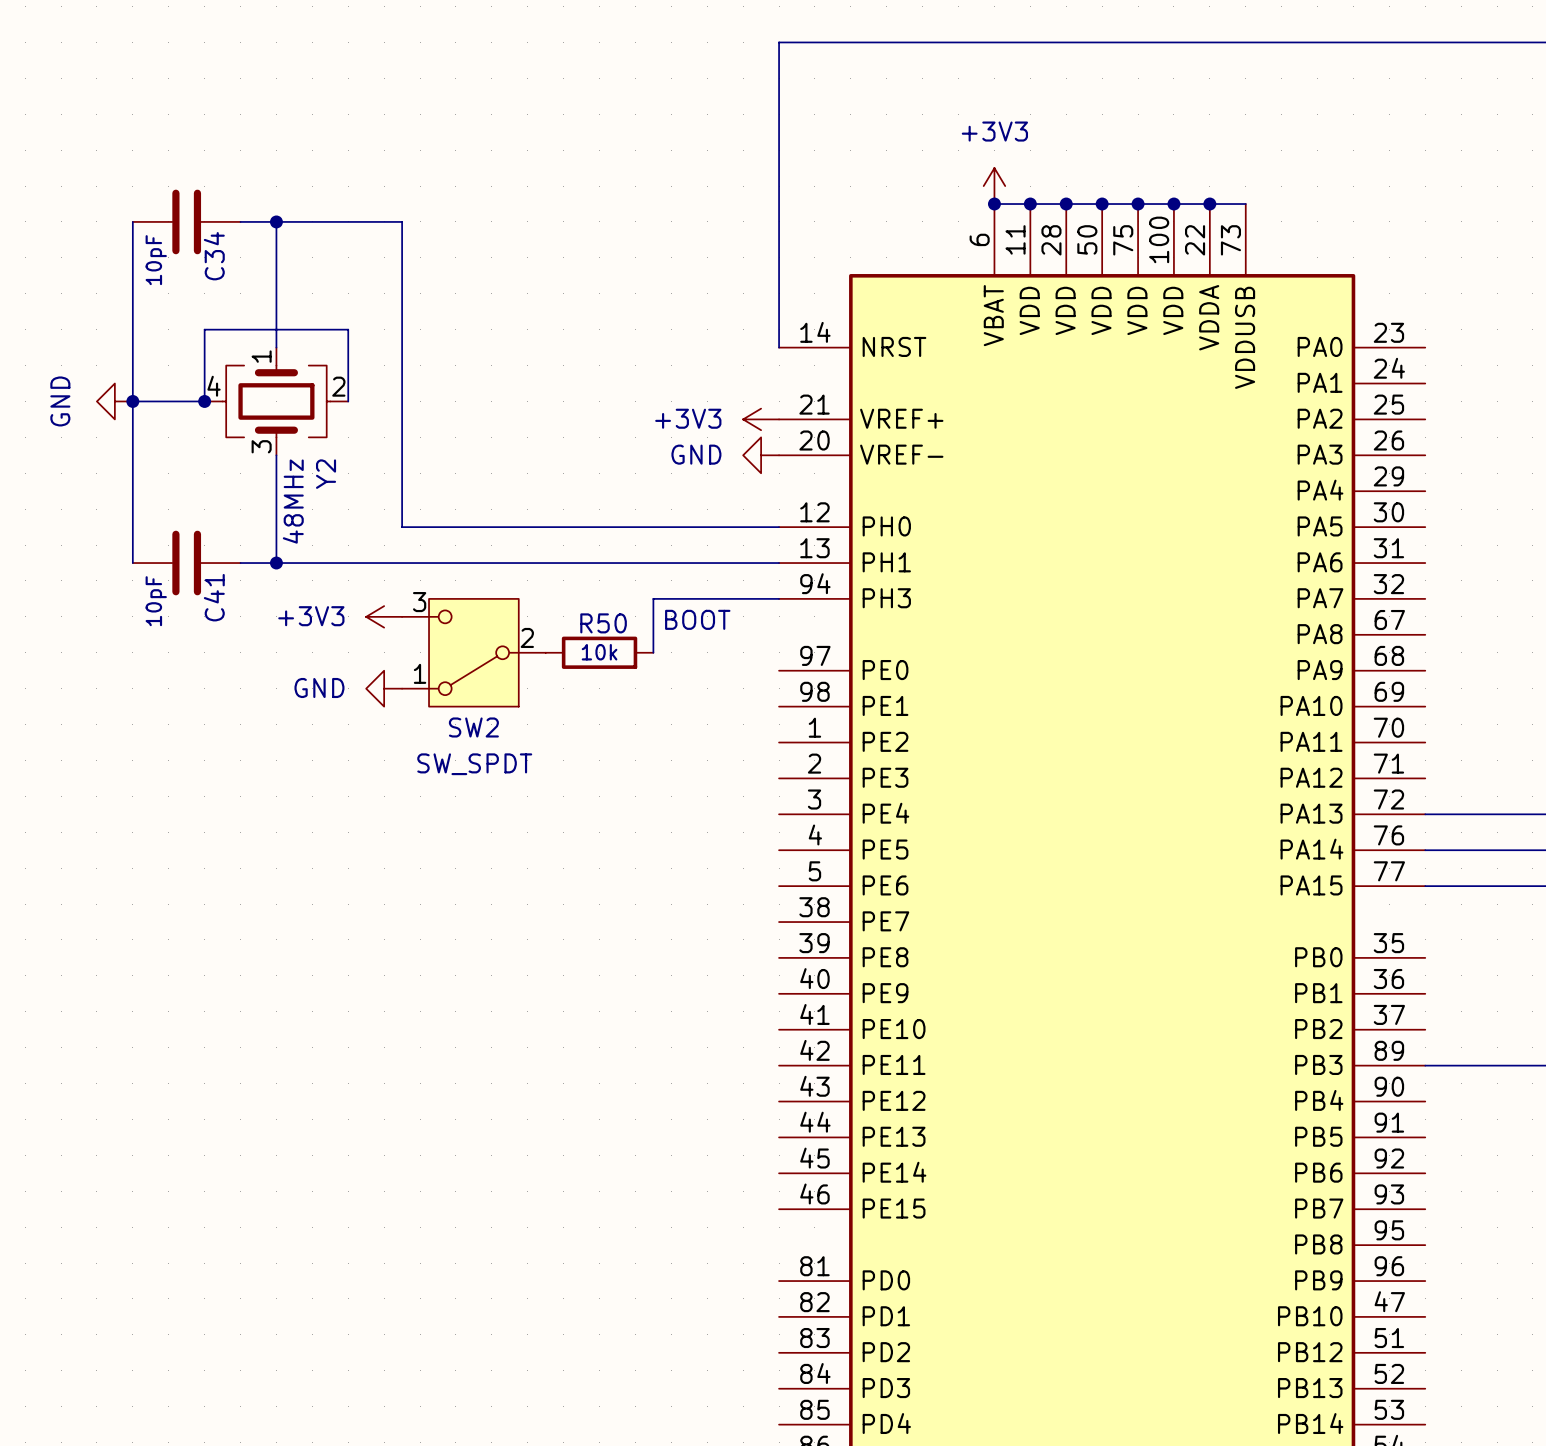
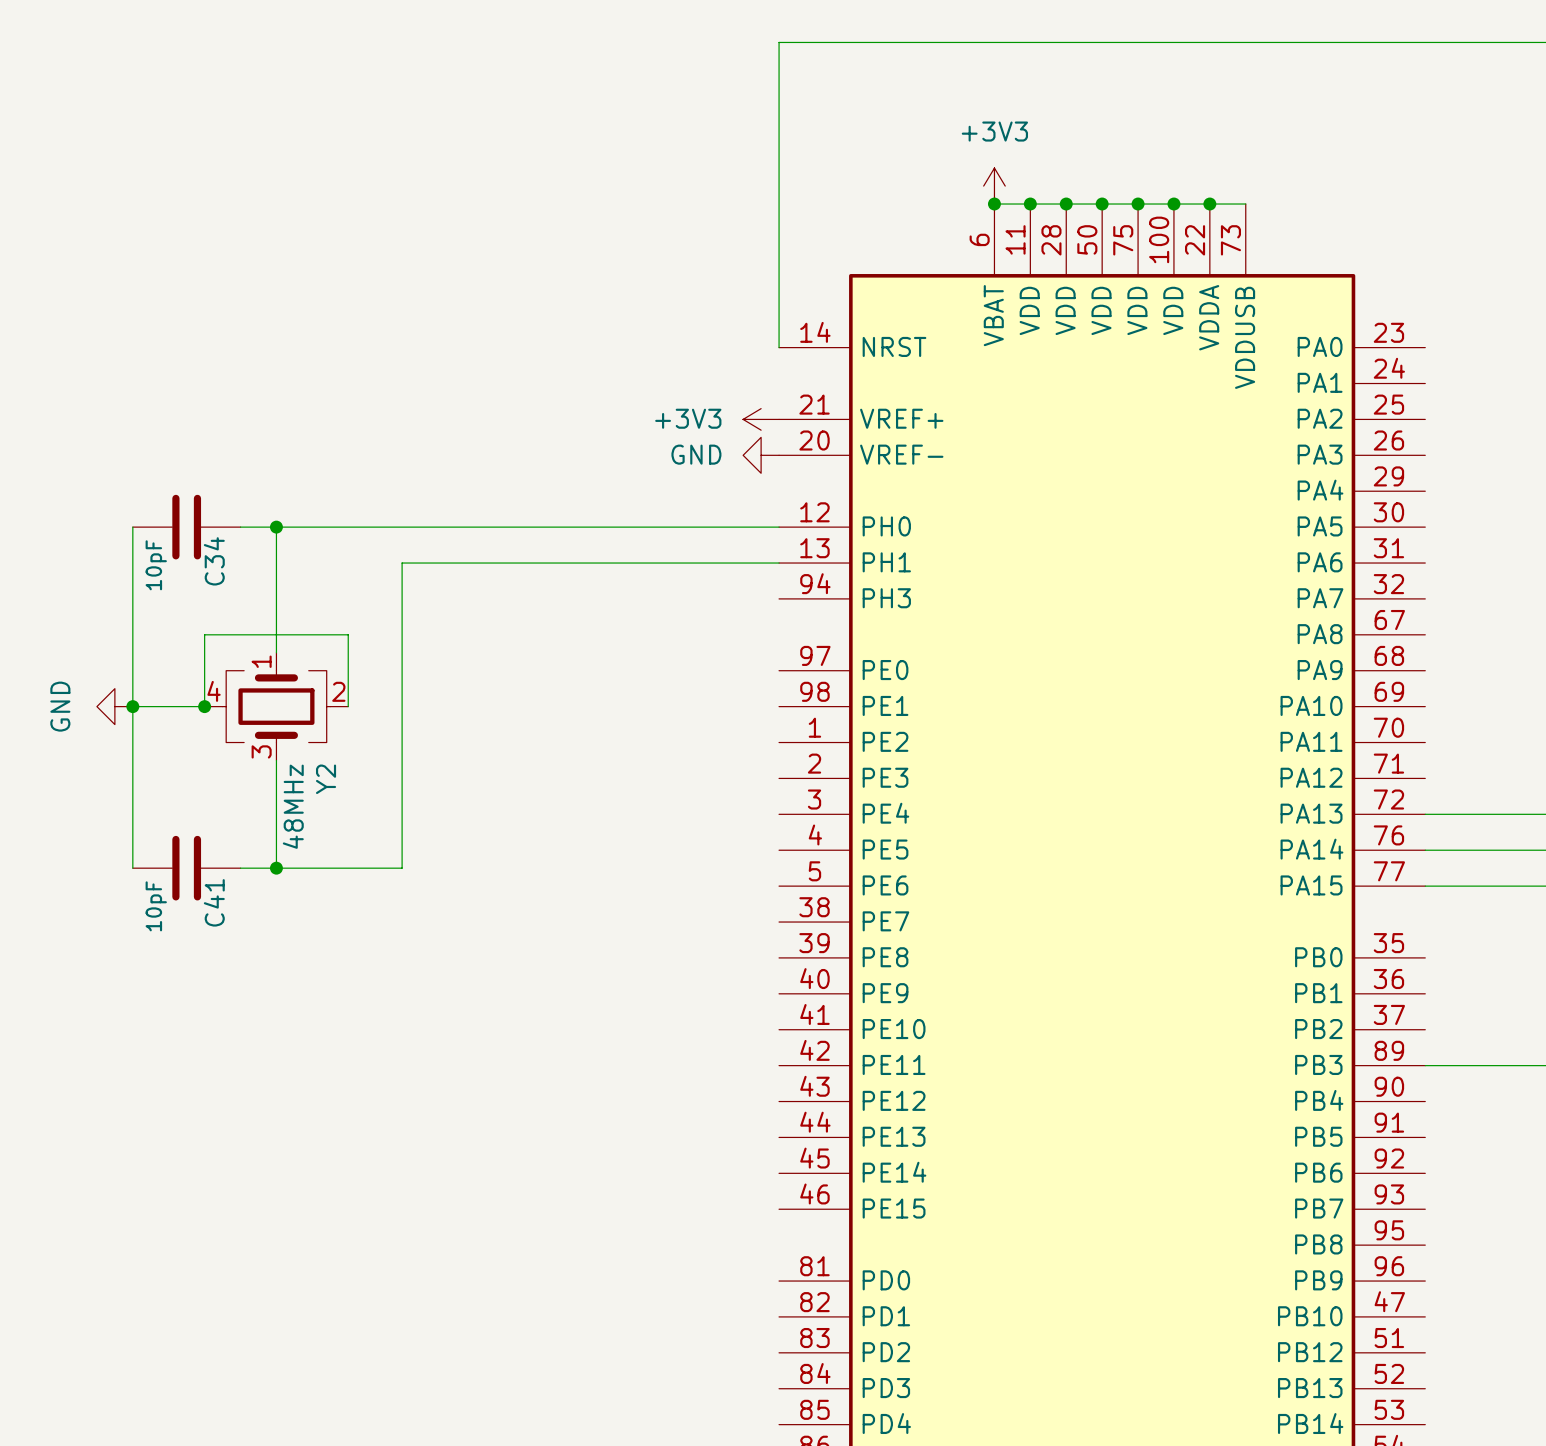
wire: (132, 221) (132, 527) -> (132, 563) (132, 868)
C34 position: (186, 221) -> (186, 527)
wire: (240, 221) (402, 221) (402, 527) -> (240, 527) (402, 527)
wire: (276, 221) (276, 347) -> none
junction: (276, 221) -> none
power symbol: GND (114, 401) -> none
wire: (132, 401) (204, 401) (204, 329) (348, 329) (348, 401) -> (132, 706) (204, 706) (204, 634) (348, 634) (348, 706)
junction: (132, 401) -> none
junction: (204, 401) -> none
Y2 position: (276, 401) -> (276, 706)
wire: (276, 455) (276, 527) -> none
C41 position: (186, 563) -> (186, 868)
wire: (240, 563) (402, 563) -> (240, 868) (402, 868) (402, 563)
wire: none -> (276, 563) (276, 652)
junction position: (276, 563) -> (276, 527)
wire: (779, 598) (653, 598) (653, 652) -> none
power symbol: +3V3 (384, 616) -> none
text: BOOT (697, 619) -> none
SW2: SW_SPDT (473, 652) -> none
R50: 10k (599, 652) -> none
power symbol: GND (384, 688) -> none
power symbol: none -> GND (114, 706)
junction: none -> (132, 706)
junction: none -> (204, 706)
wire: none -> (276, 760) (276, 868)
junction: none -> (276, 868)

